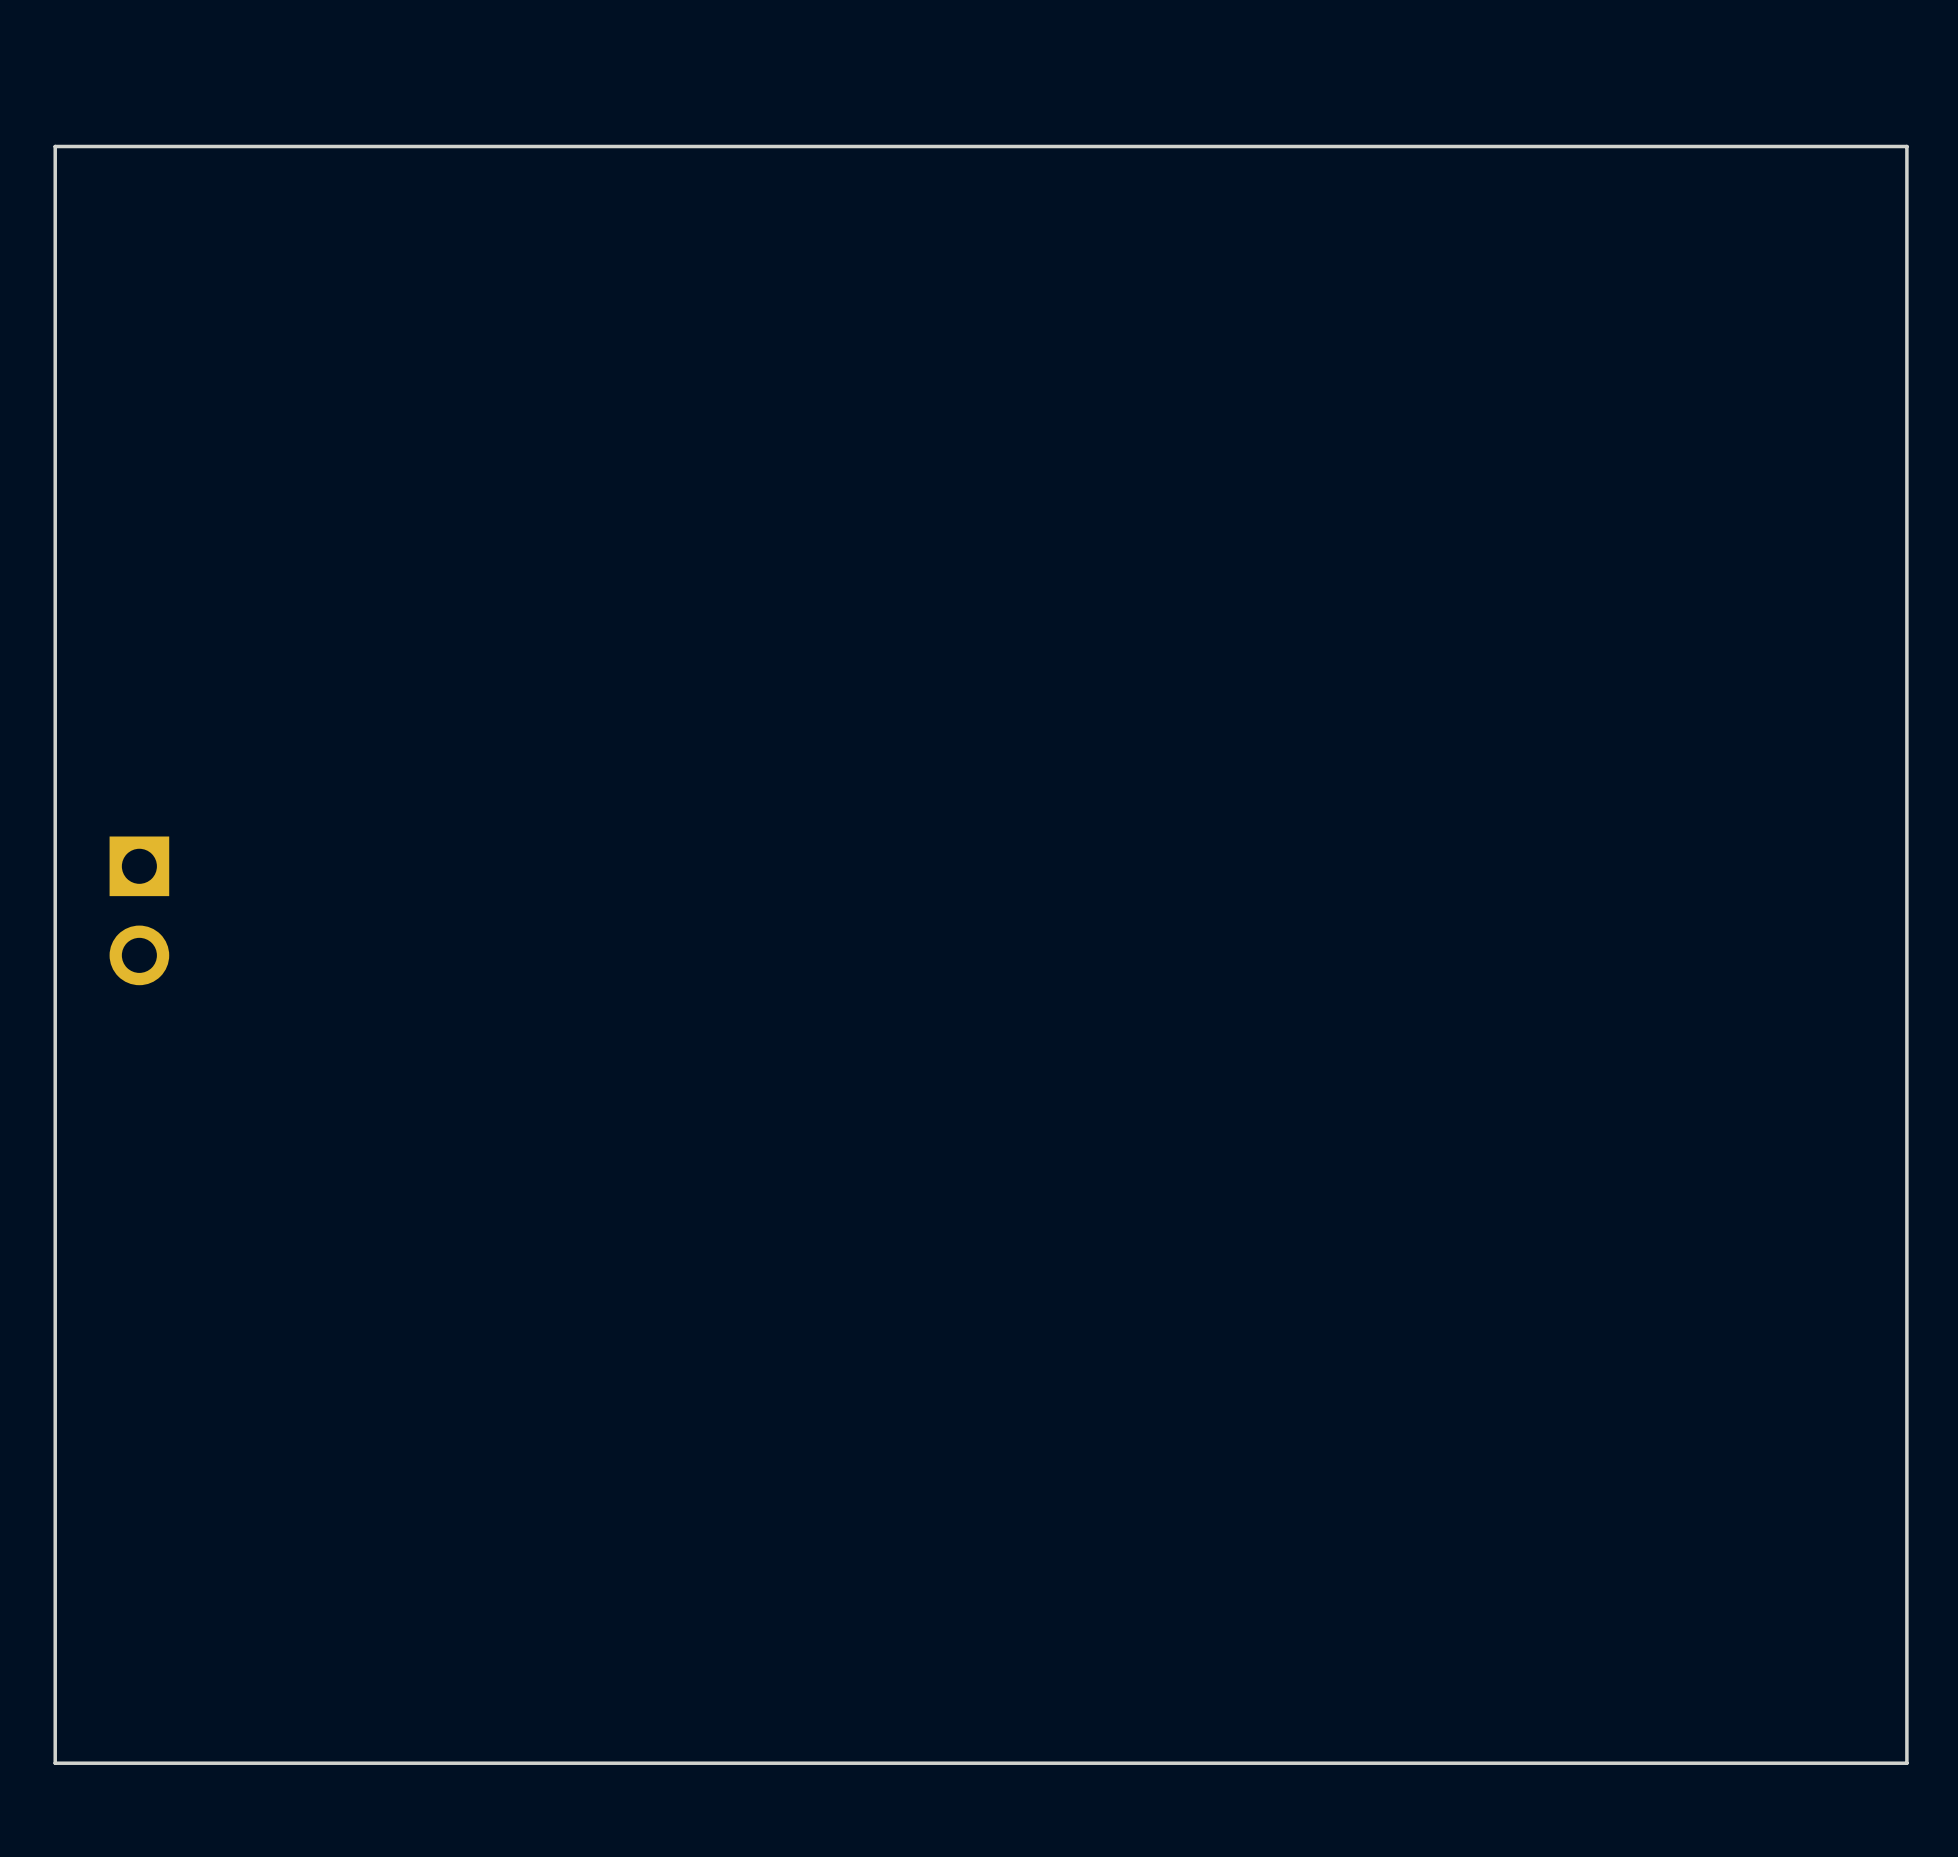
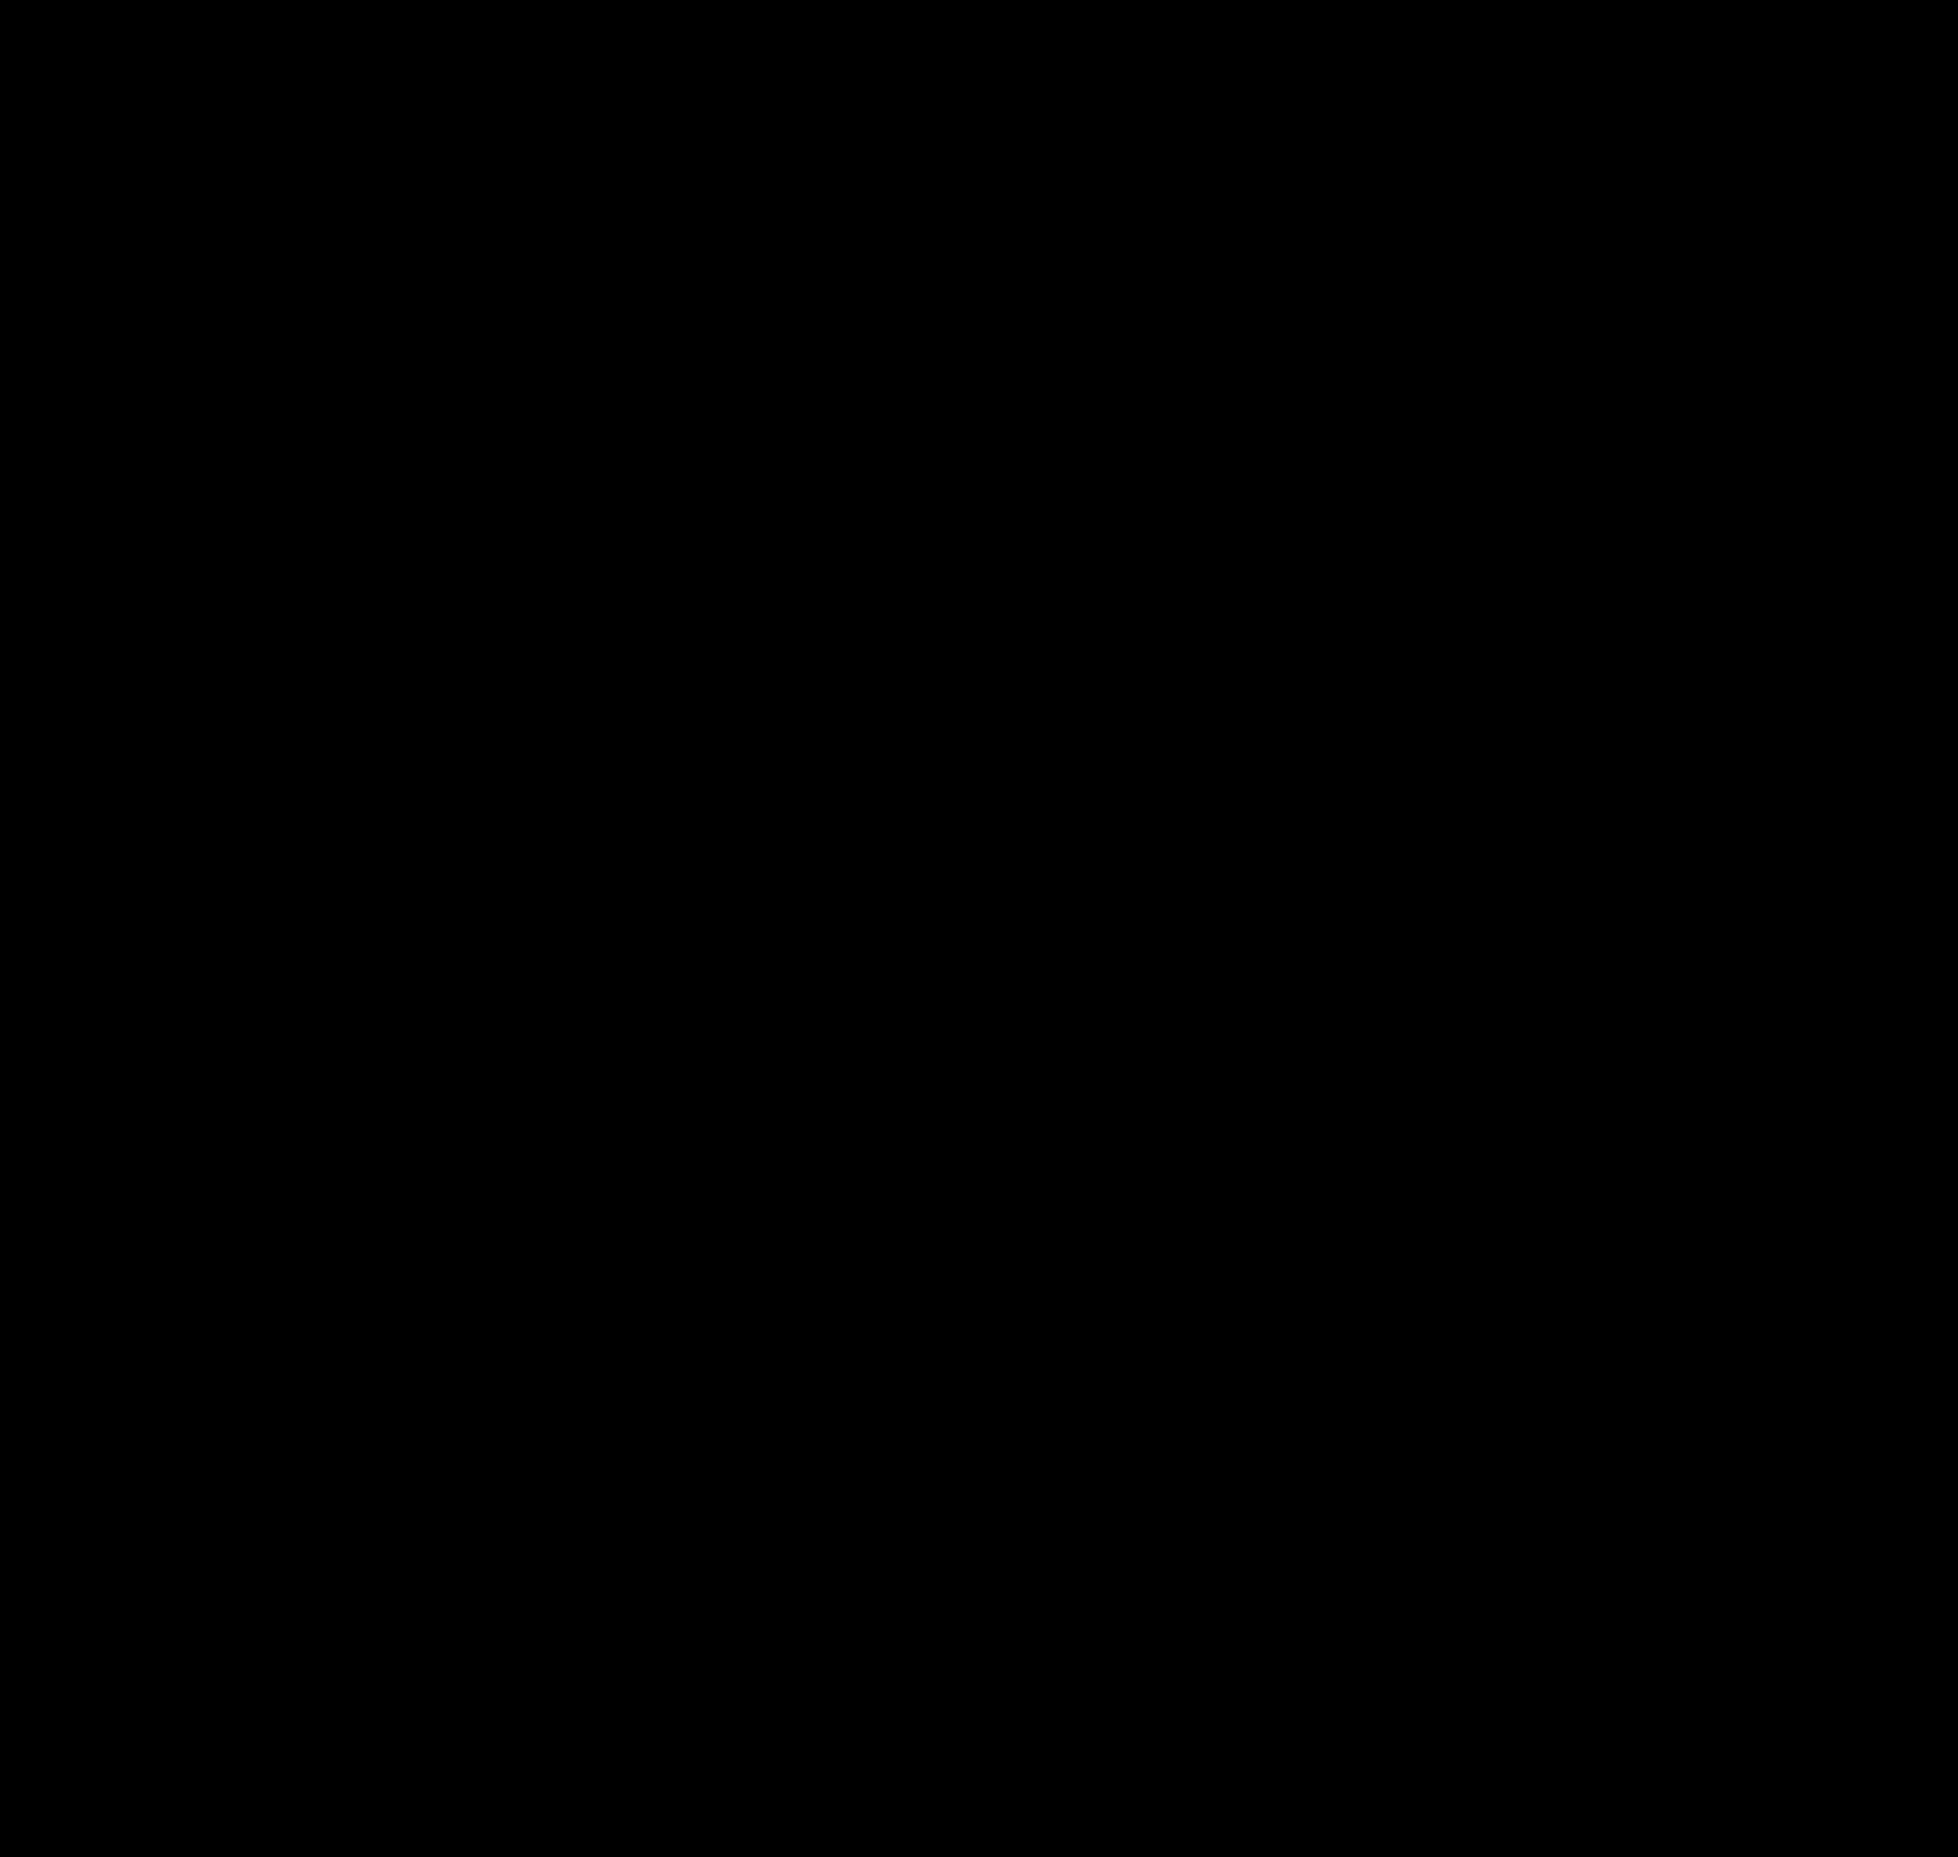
board edge: (1906, 146) (55, 146) (55, 1763) (1906, 1763) (1906, 146) -> none
part: (139, 910) -> none

